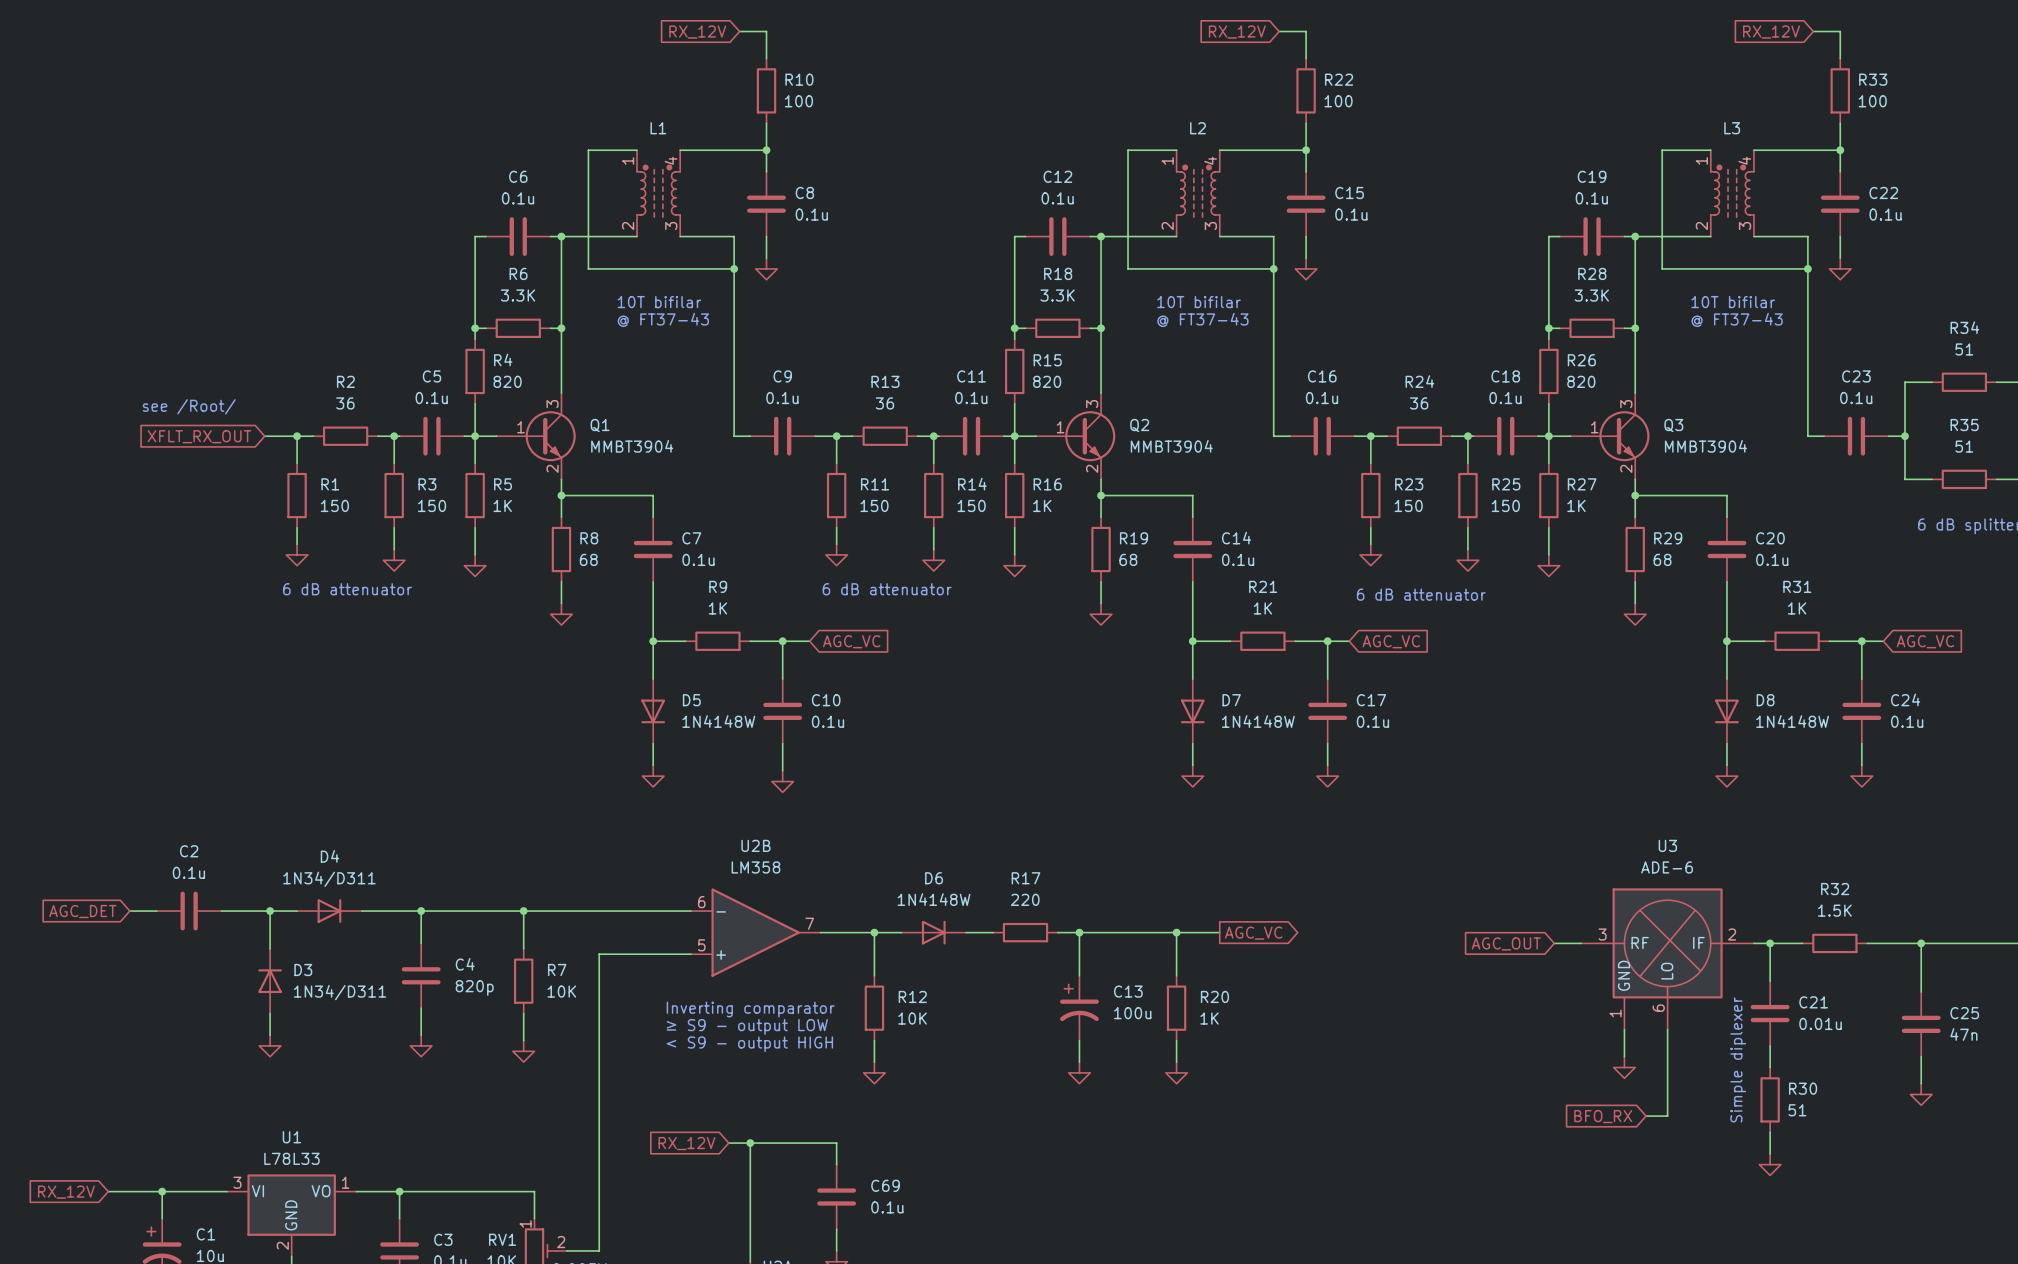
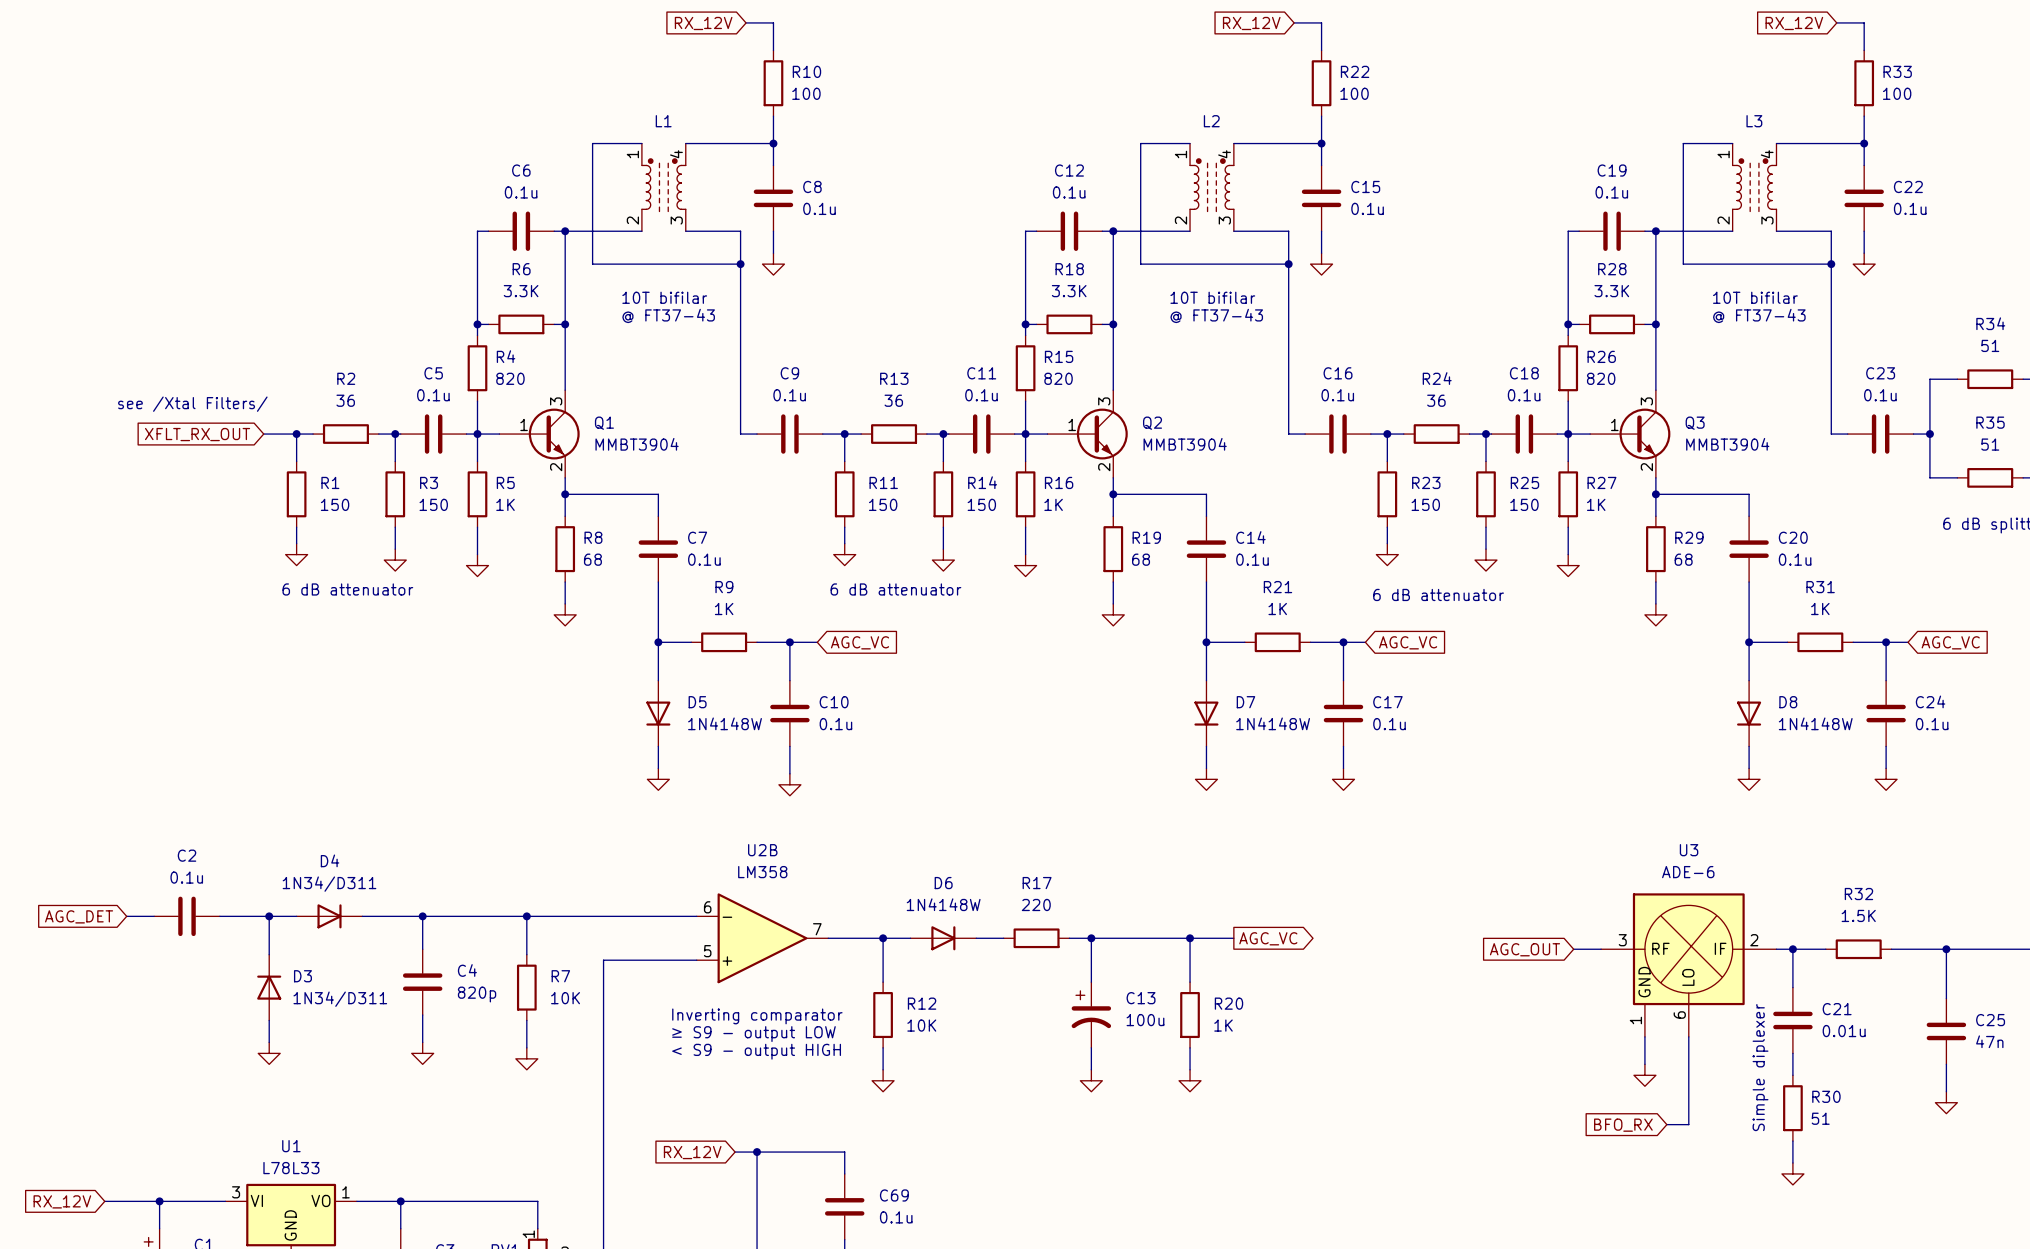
text: see /Root/ (189, 406) -> none
text: none -> see /Xtal Filters/ (192, 404)

